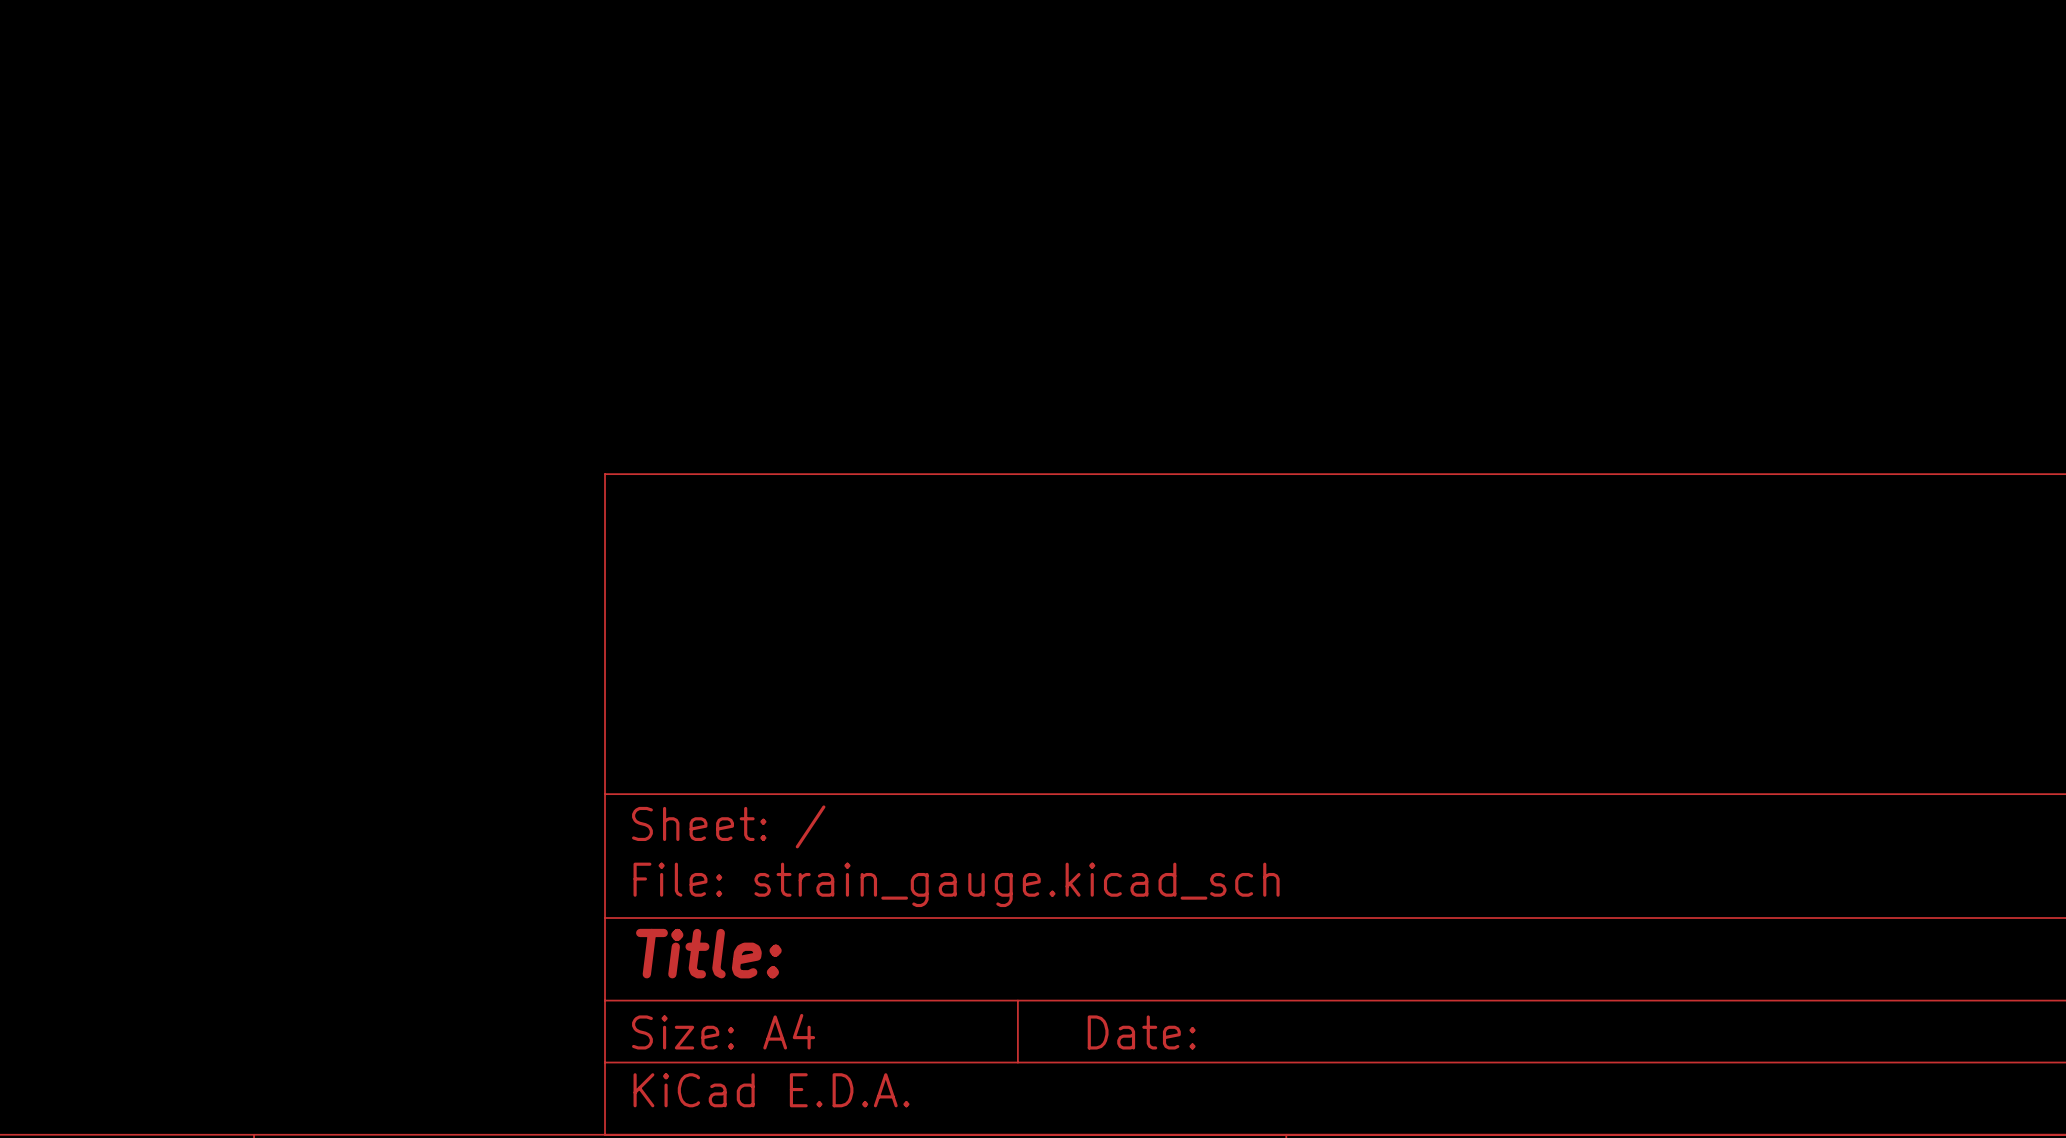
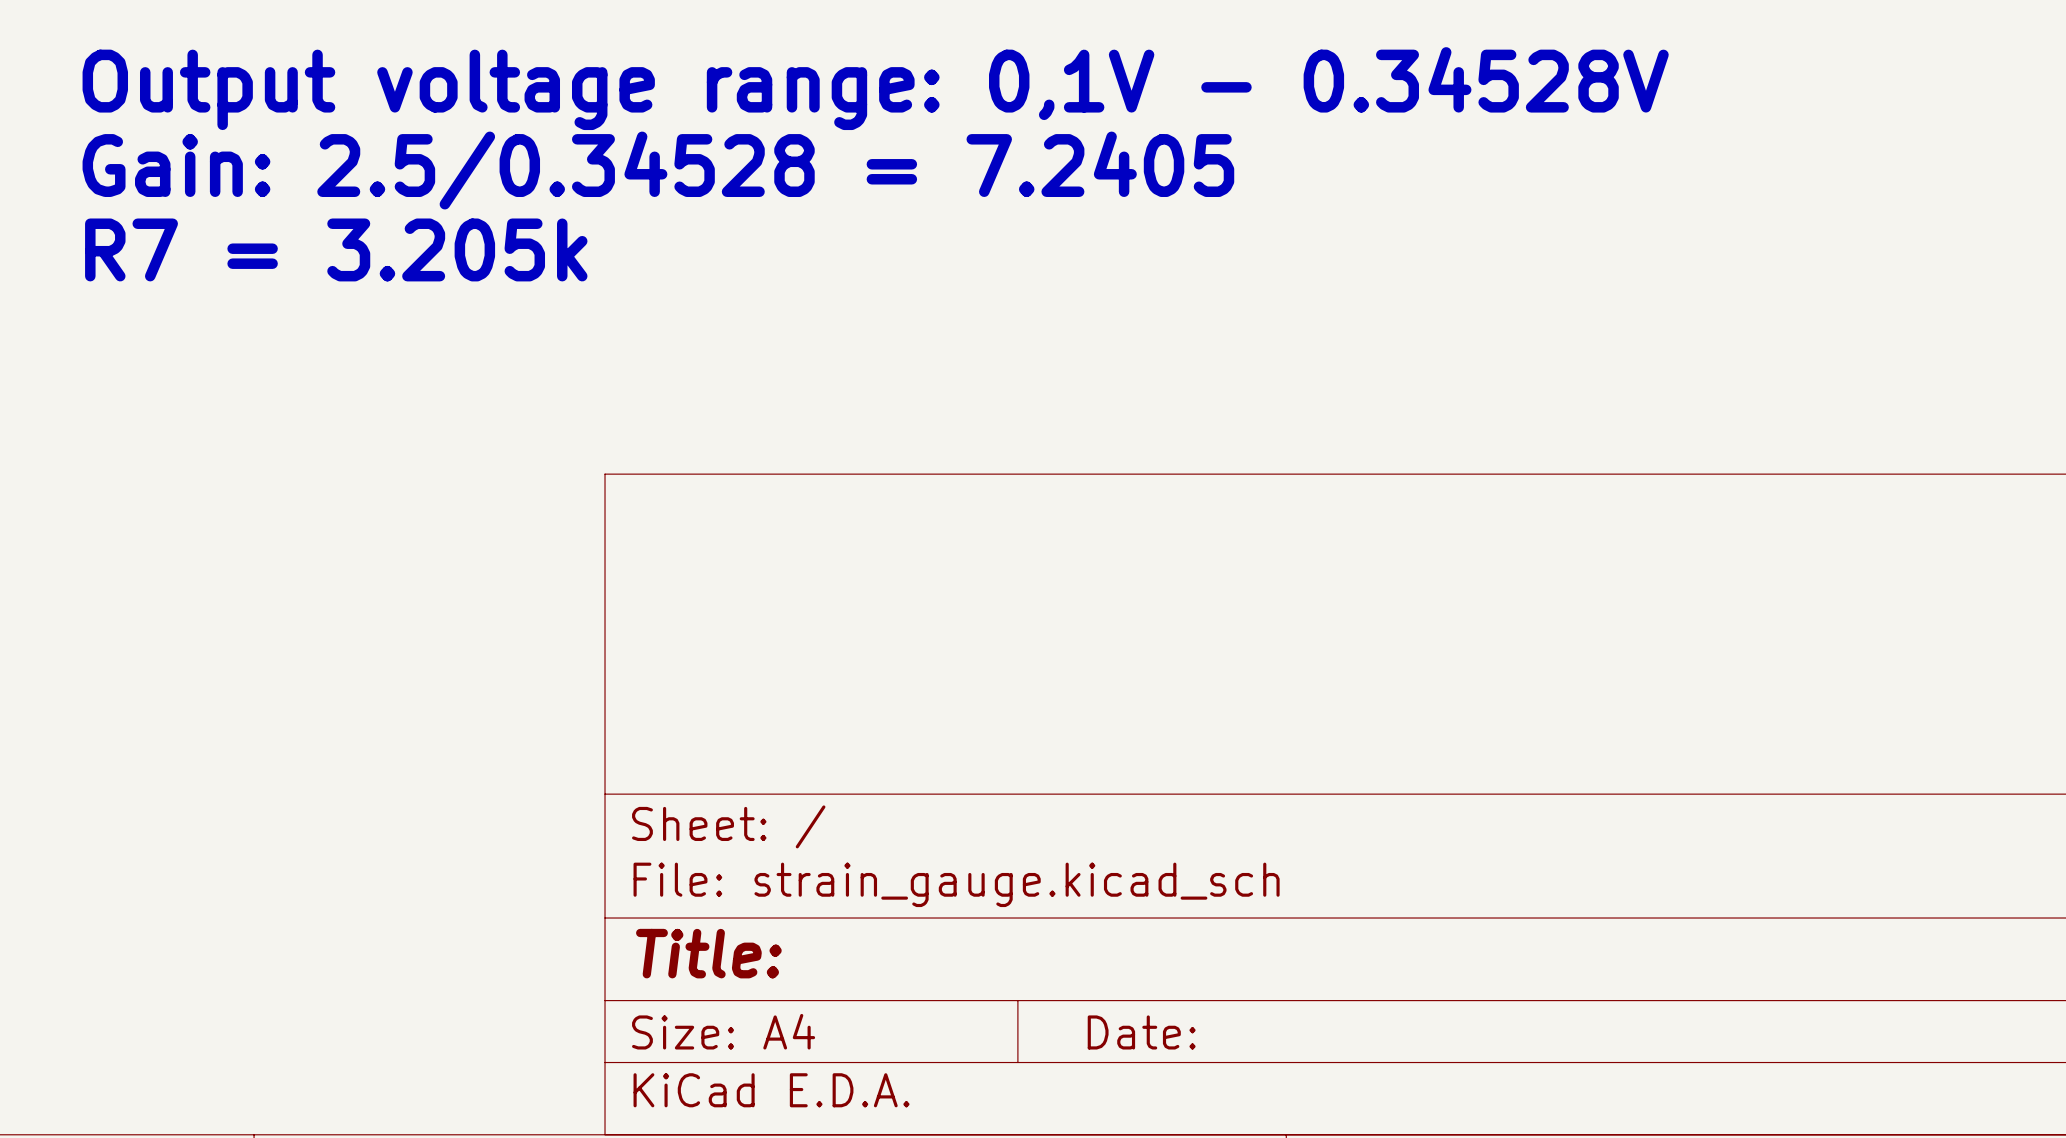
text: none -> Output voltage range: 0,1V - 0.34528V (875, 88)
text: none -> Gain: 2.5/0.34528 = 7.2405 (658, 170)
text: none -> R7 = 3.205k (336, 249)

